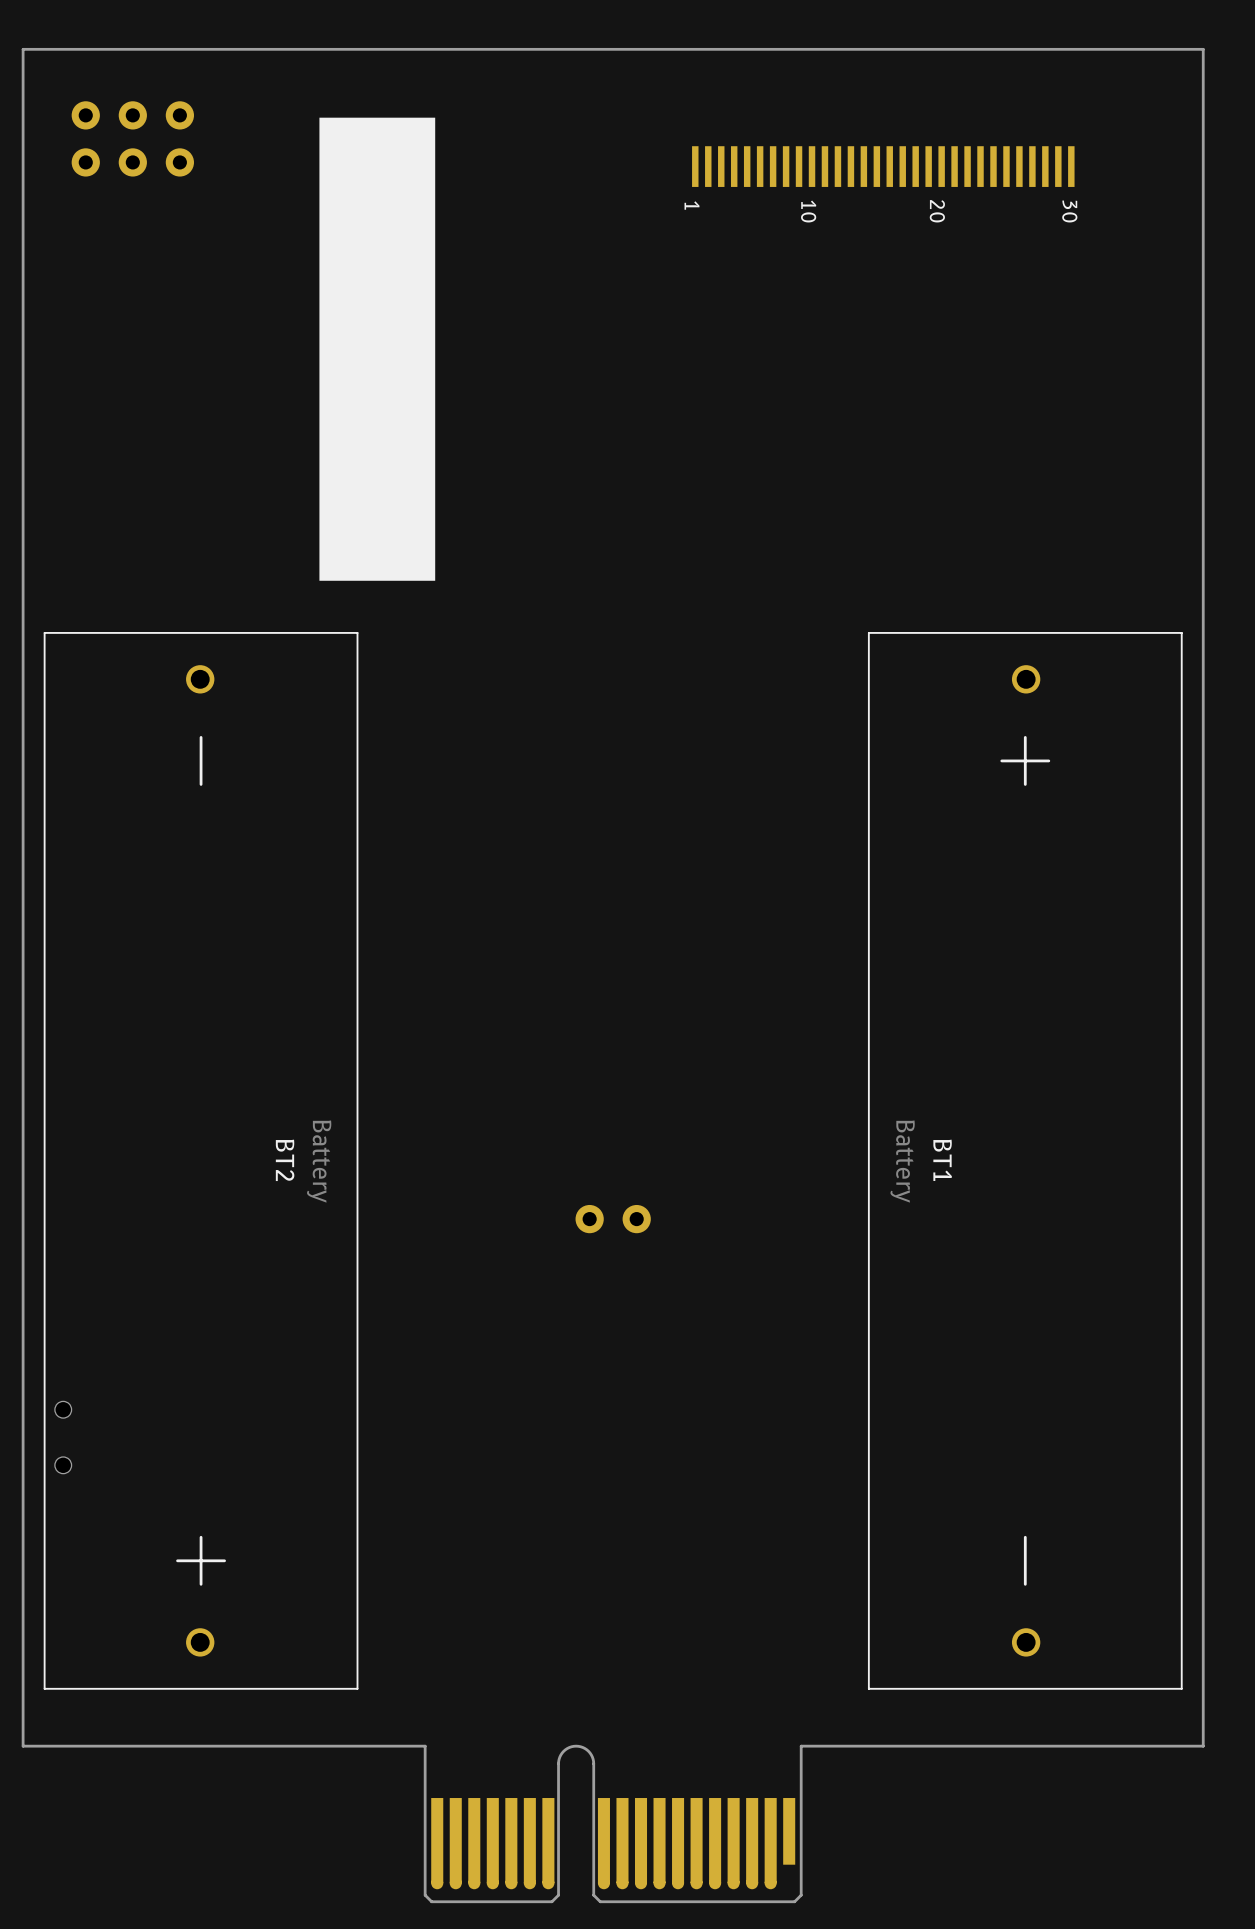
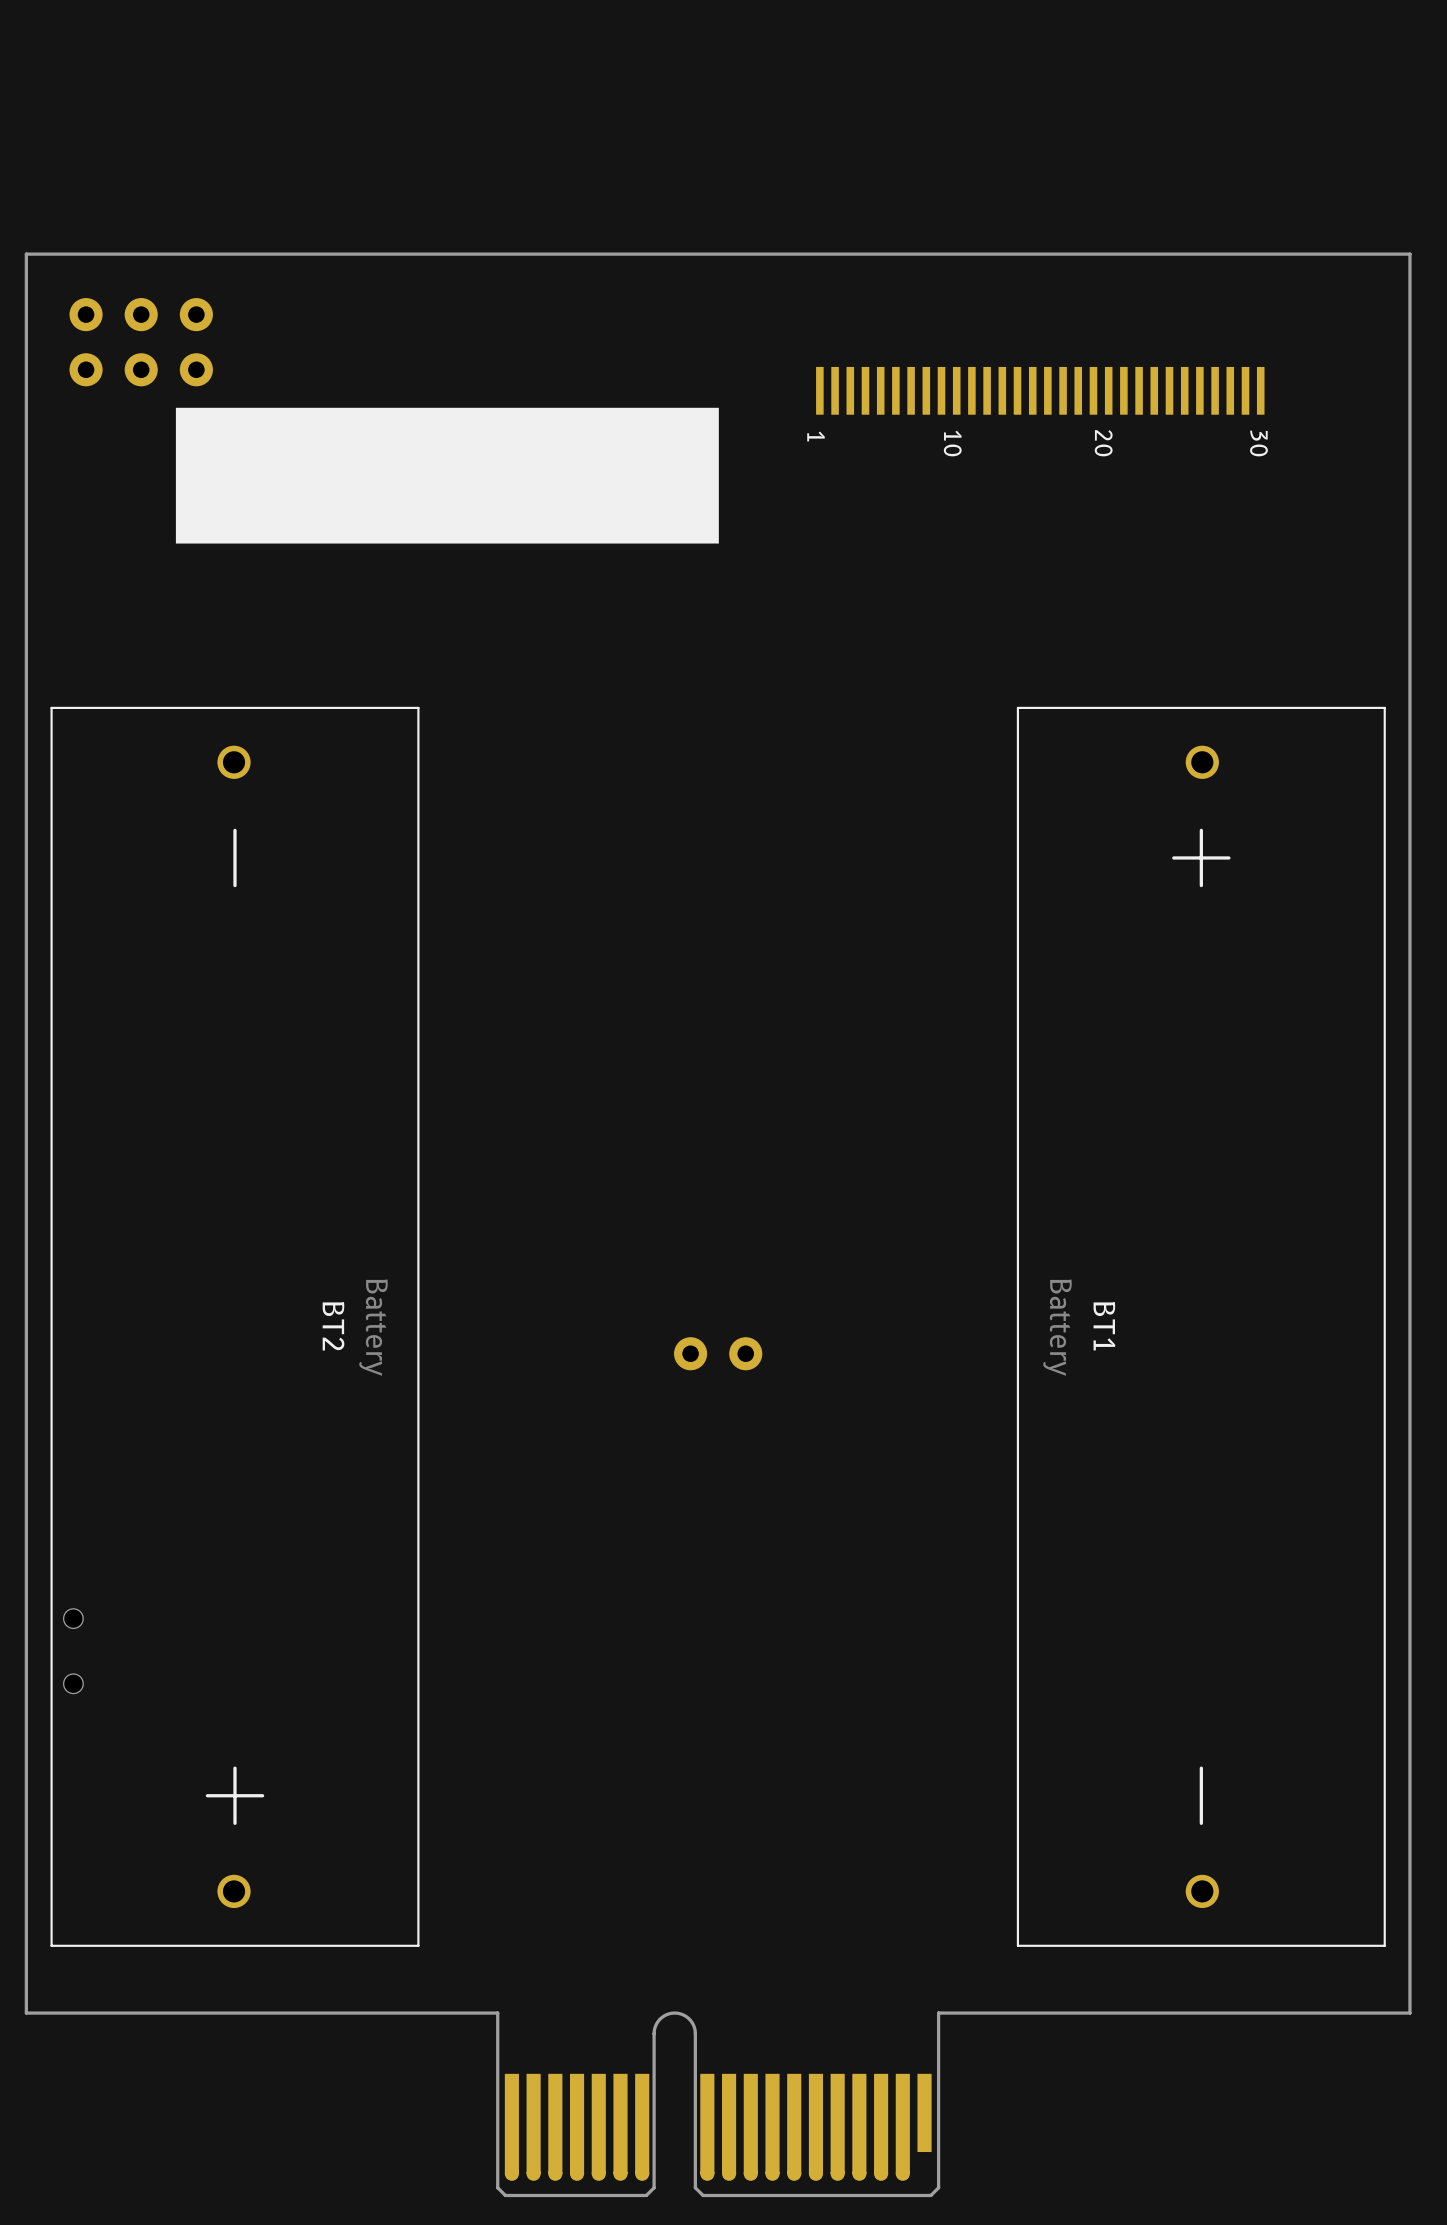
drawing: [319, 117, 436, 581] -> none
part position: (132, 138) -> (141, 342)
part position: (883, 166) -> (1040, 390)
board edge: (1203, 245) (1203, 49) (23, 49) (23, 245) -> (1409, 254) (26, 254)
drawing: none -> [175, 407, 719, 544]
part position: (613, 1219) -> (718, 1353)

